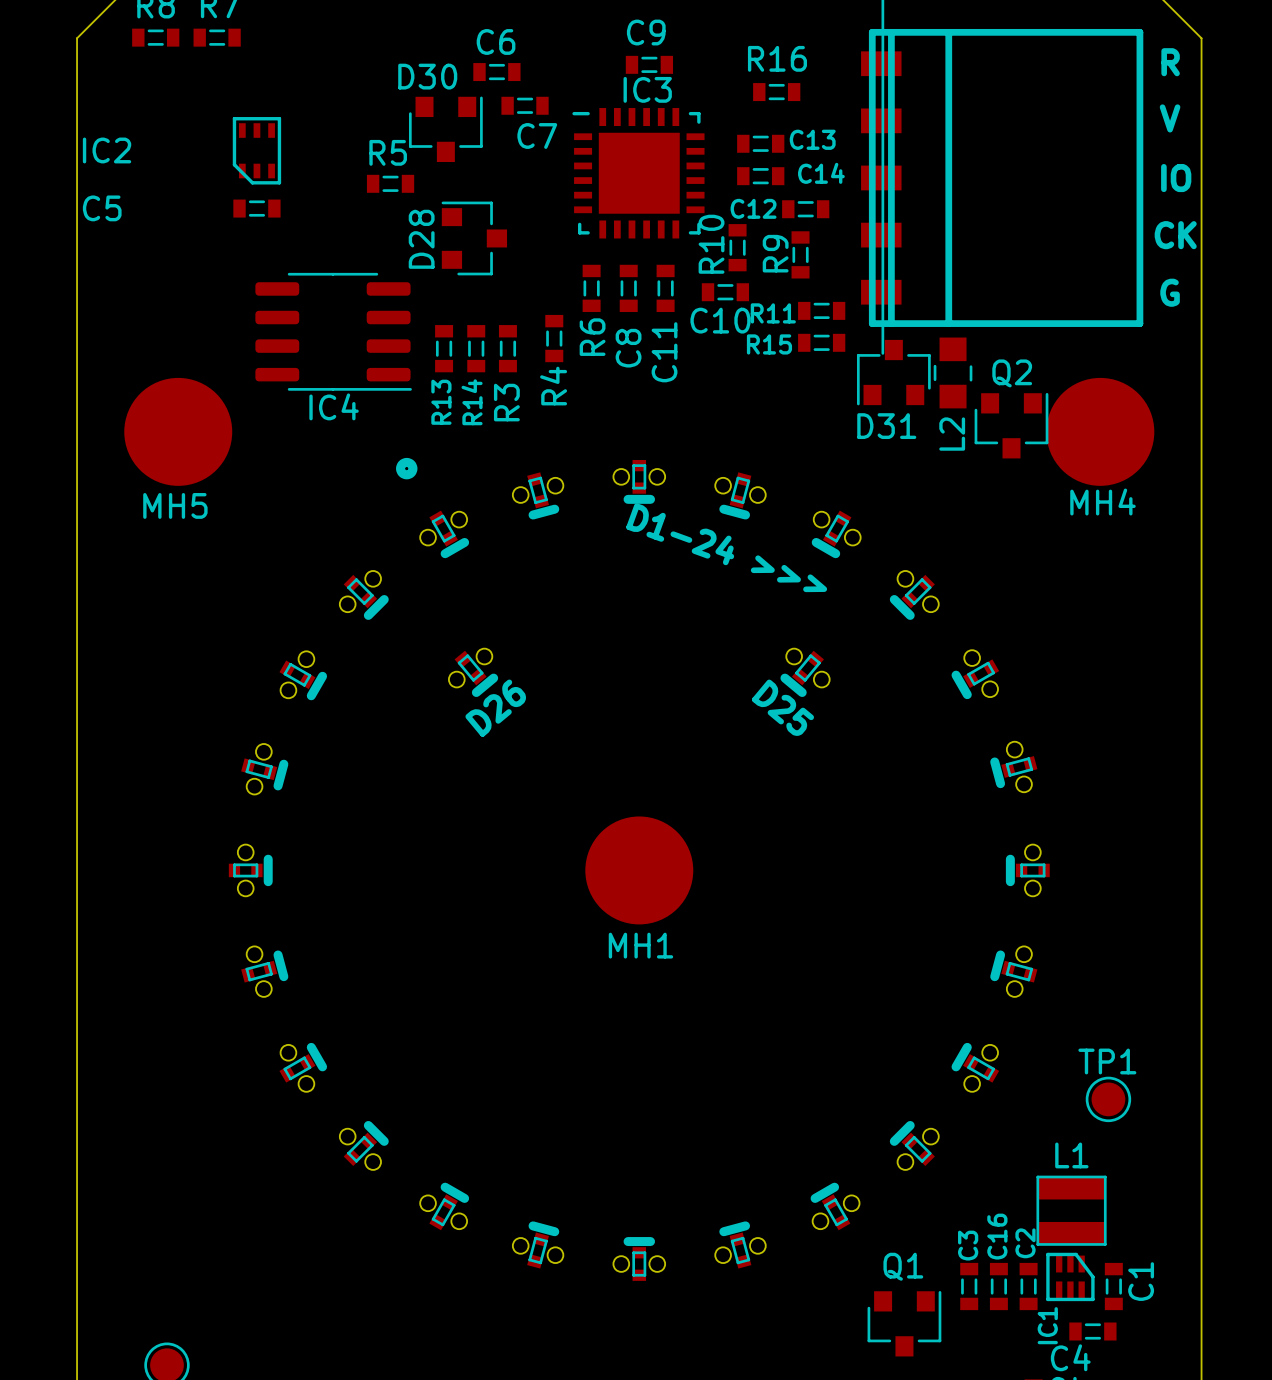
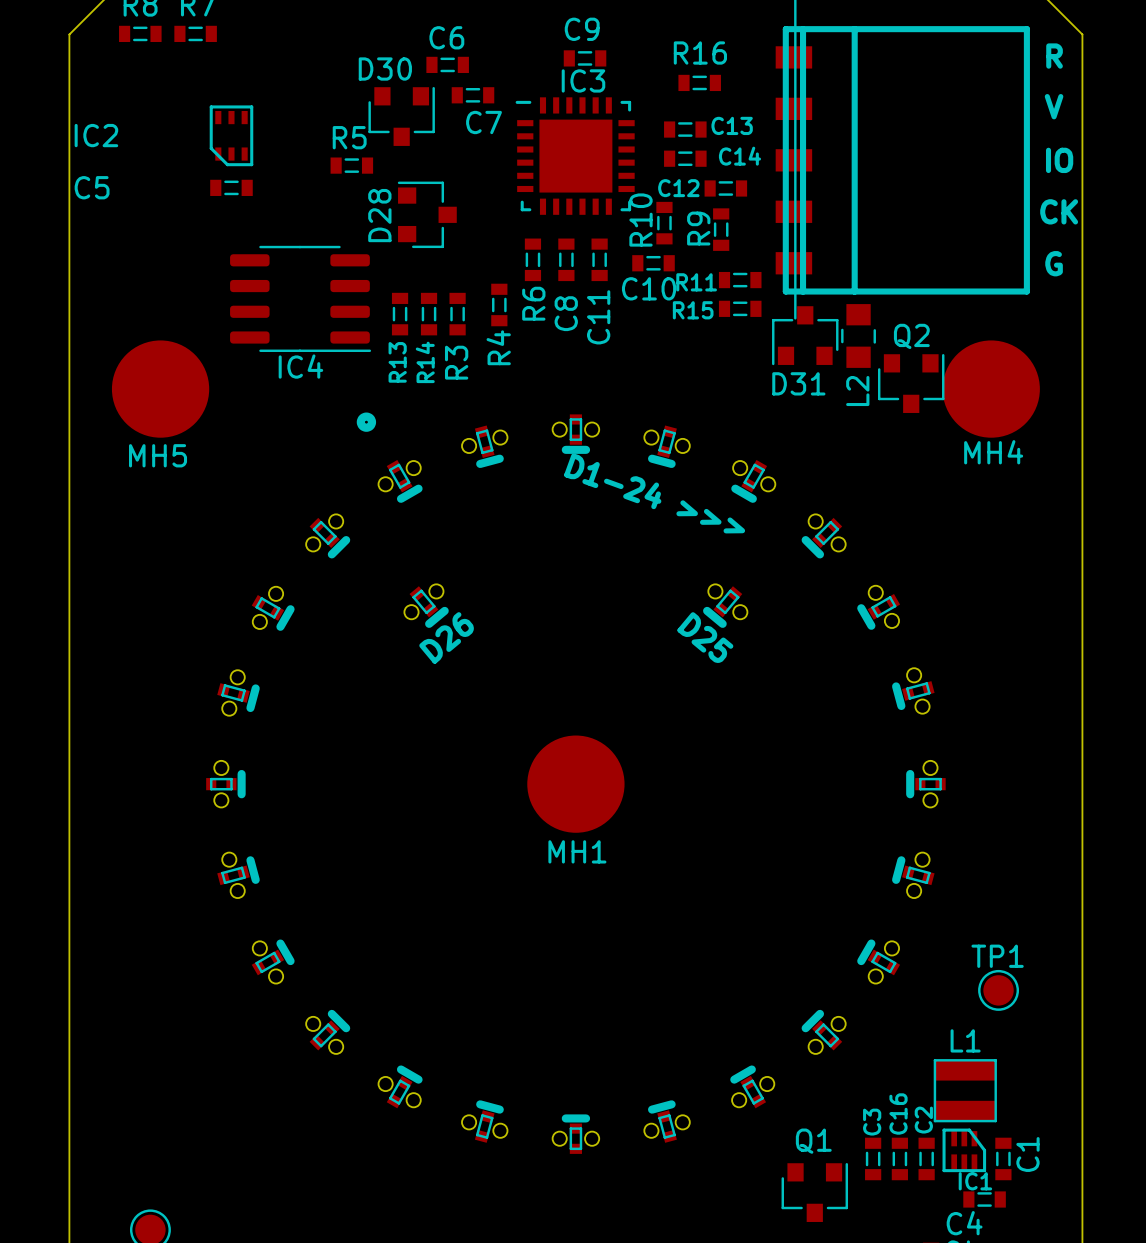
IC1 name rotation: 0° (1047, 1325) -> 90° clockwise (975, 1181)

